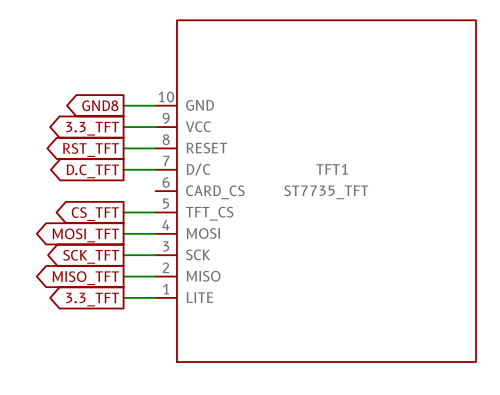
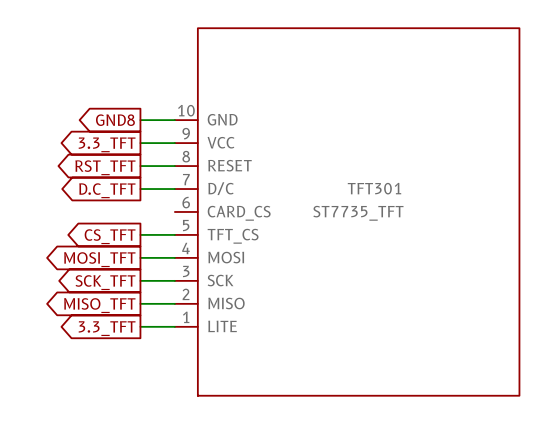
TFT1 name: TFT1 (332, 169) -> TFT301 (374, 188)

